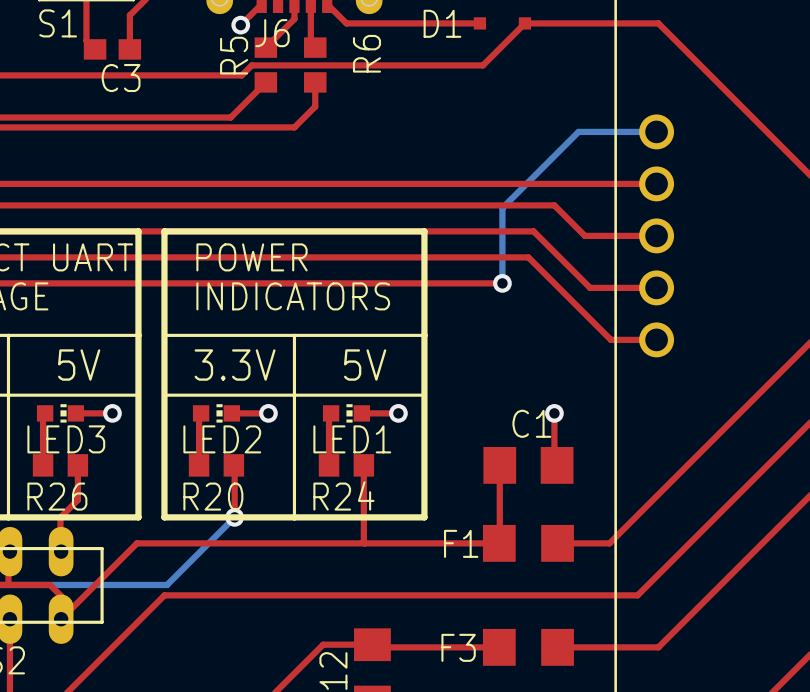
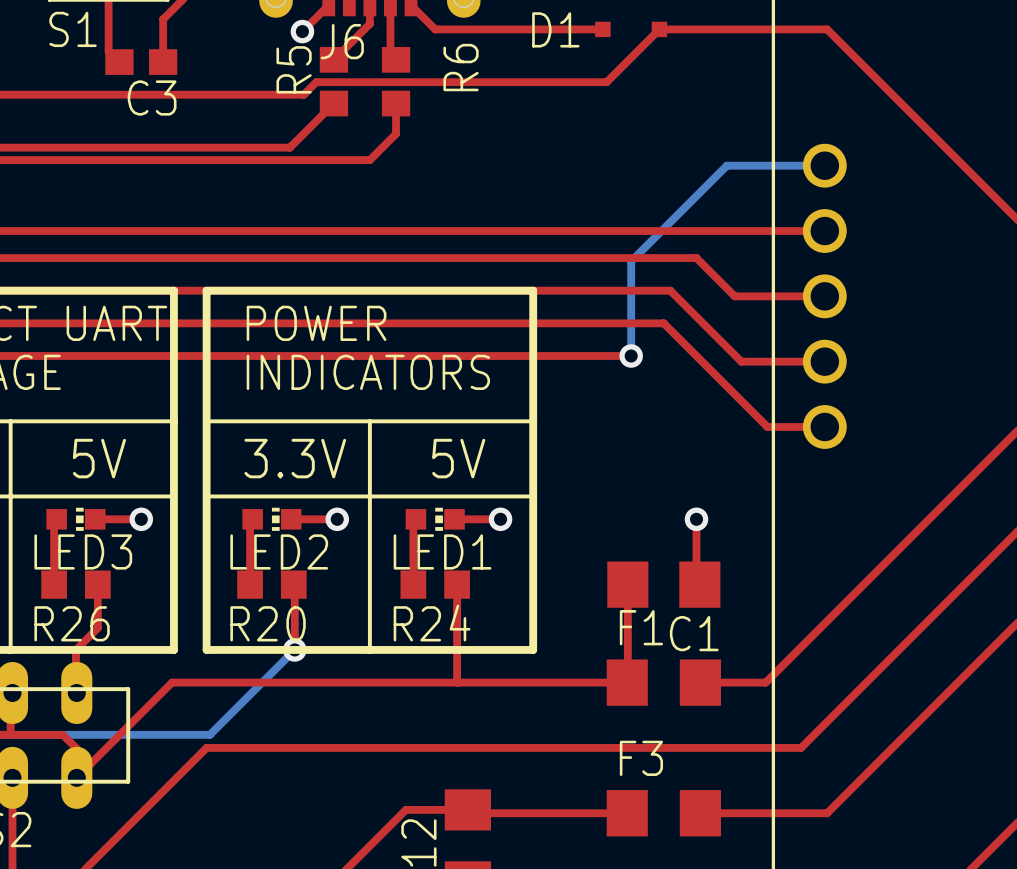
C1 name position: C1 (531, 423) -> C1 (694, 633)
F1 name position: F1 (461, 543) -> F1 (641, 627)
F3 name position: F3 (458, 647) -> F3 (641, 758)

